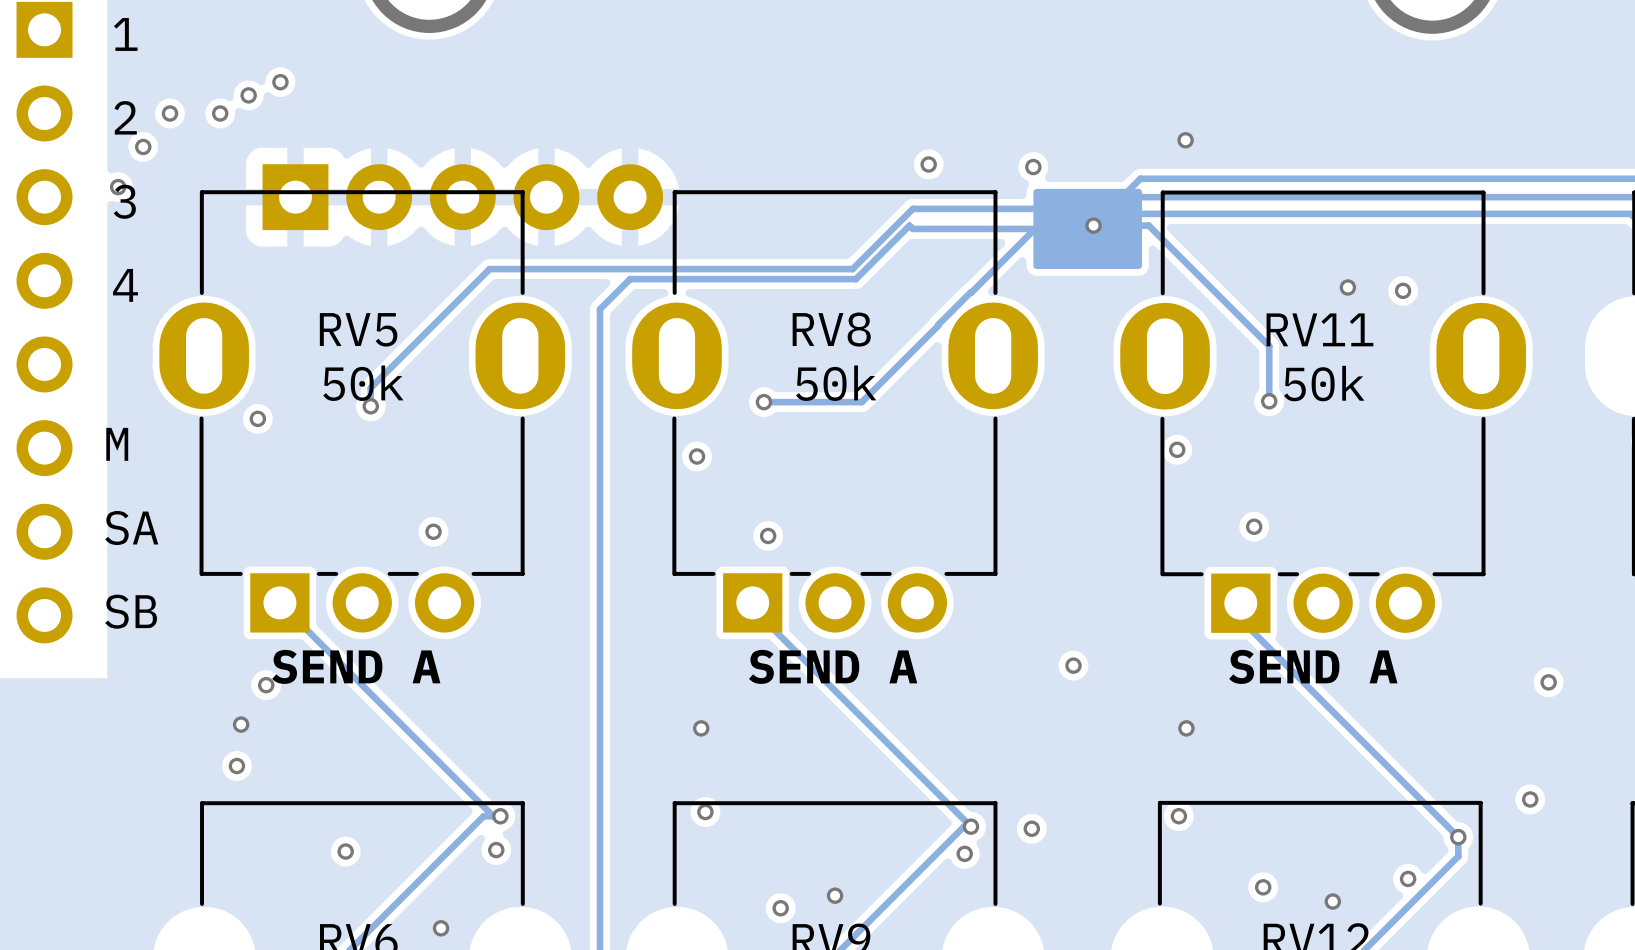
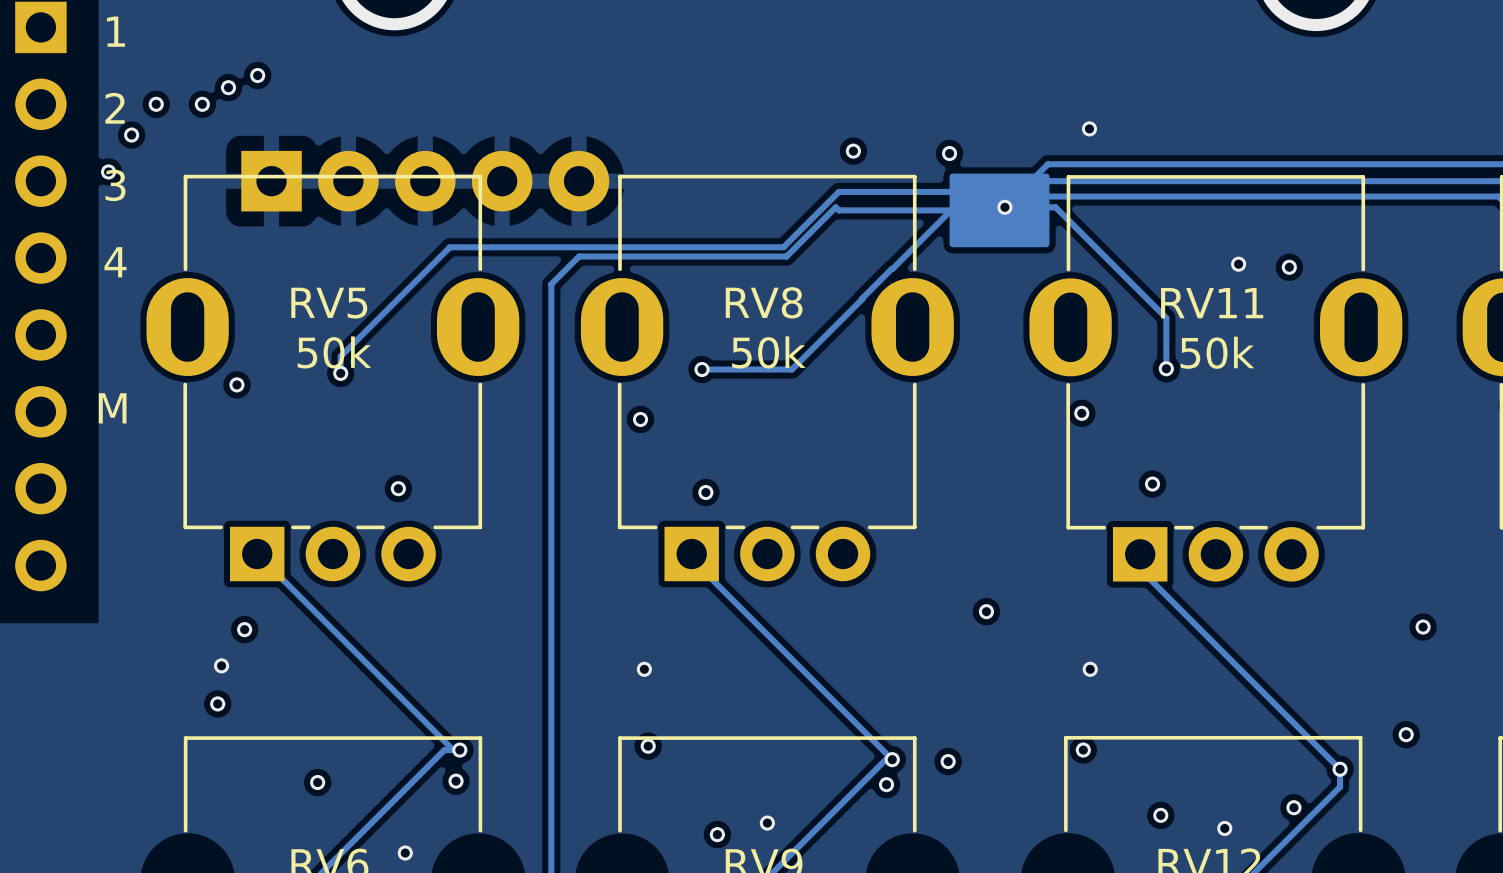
text: SA (131, 528) -> none
text: SB (131, 611) -> none
text: SEND A (356, 666) -> none
text: SEND A (833, 666) -> none
text: SEND A (1313, 666) -> none

